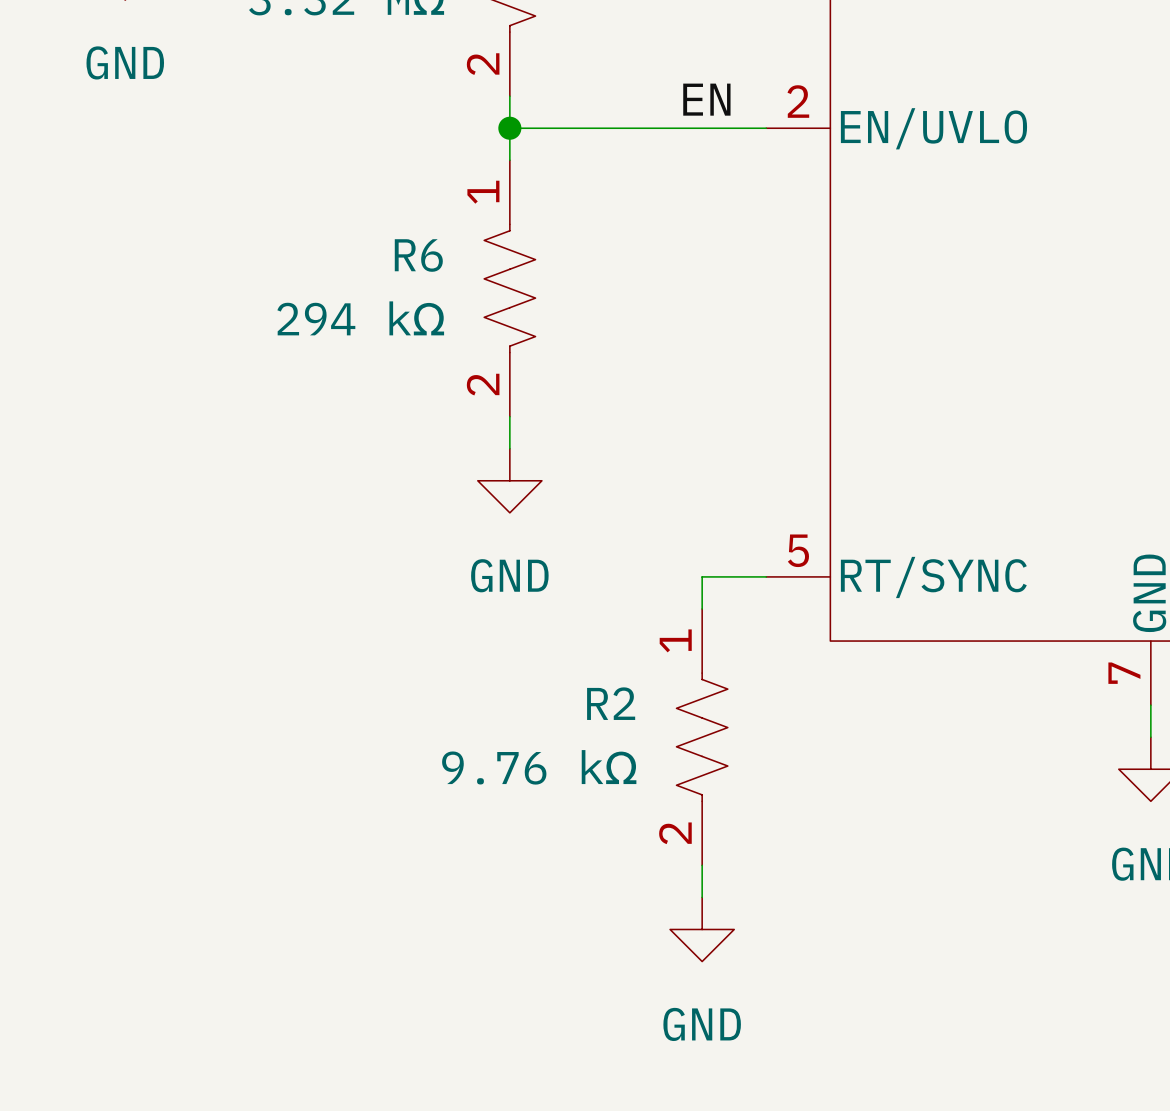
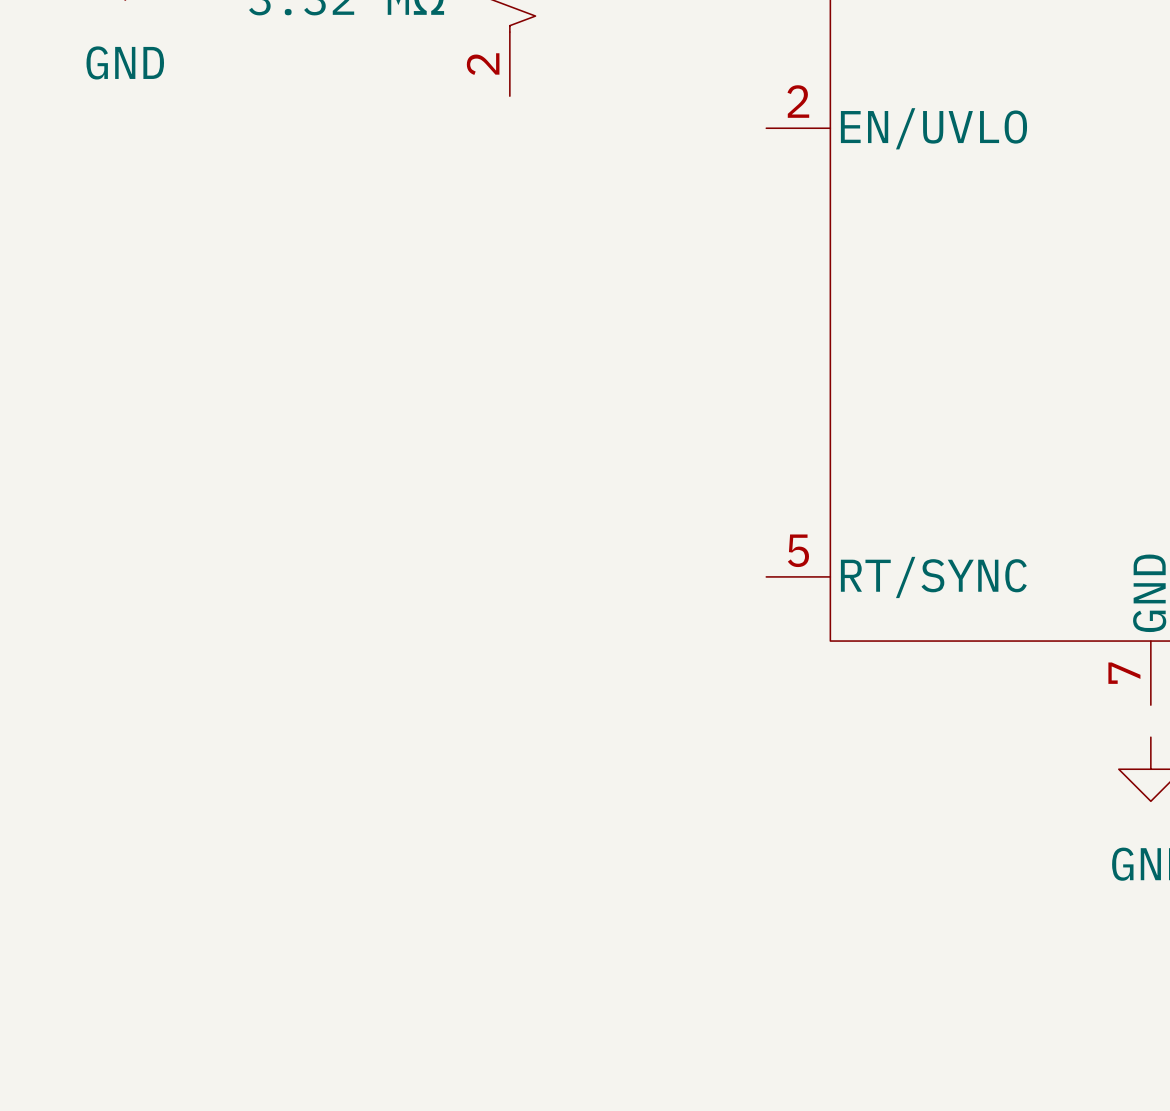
wire: (509, 96) (509, 160) -> none
label: EN (706, 99) -> none
wire: (509, 128) (766, 128) -> none
junction: (509, 128) -> none
R6: 294 kΩ (509, 288) -> none
wire: (509, 416) (509, 448) -> none
power symbol: GND (509, 480) -> none
wire: (766, 576) (702, 576) (702, 608) -> none
wire: (1150, 705) (1150, 737) -> none
R2: 9.76 kΩ (702, 737) -> none
wire: (702, 865) (702, 897) -> none
power symbol: GND (702, 929) -> none

